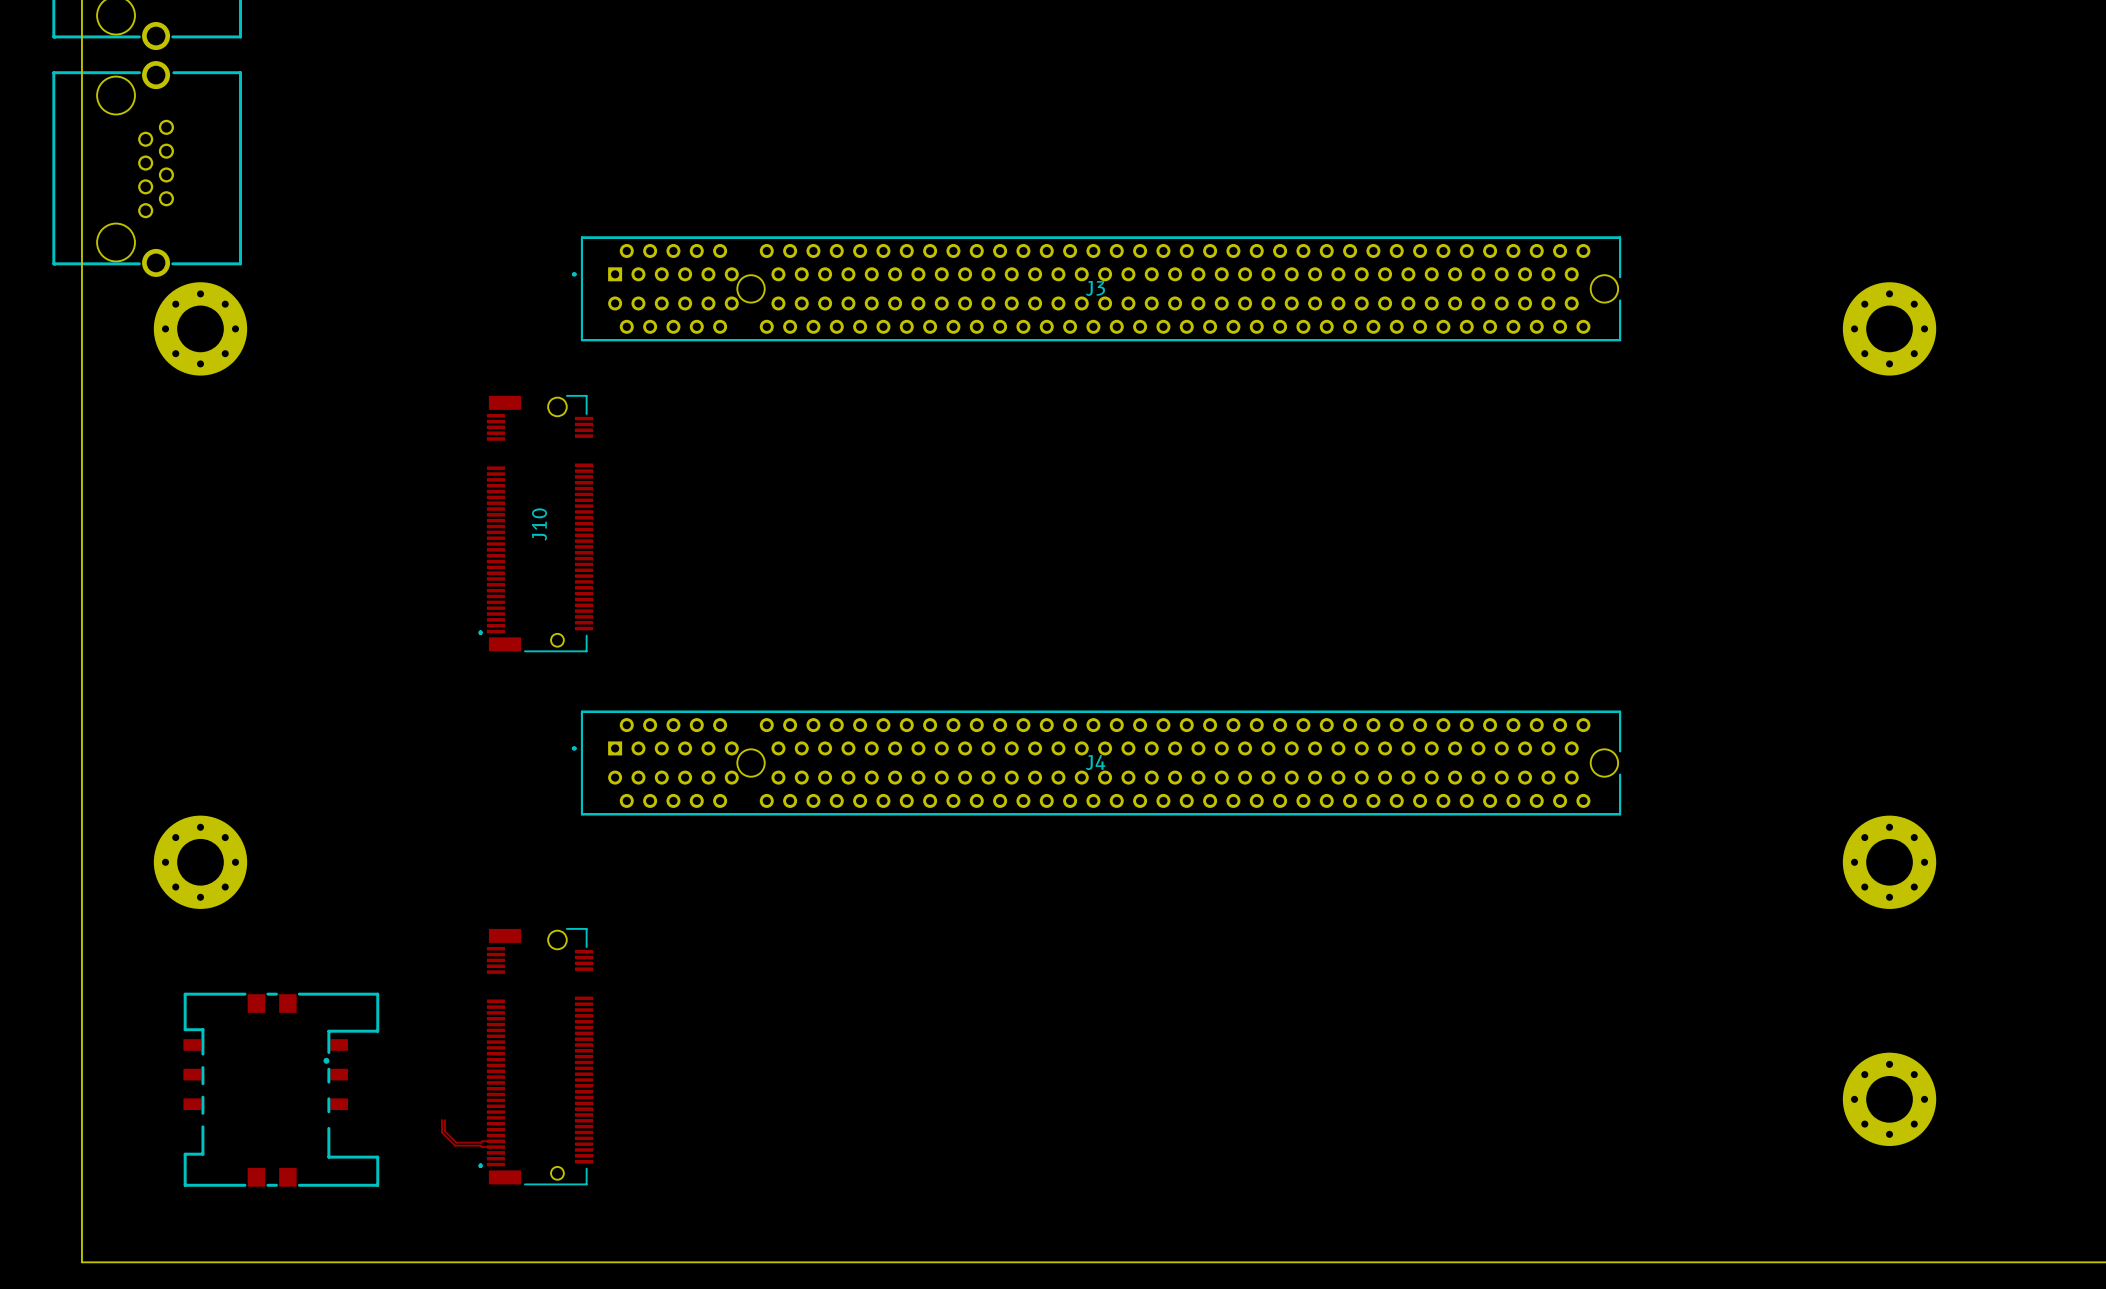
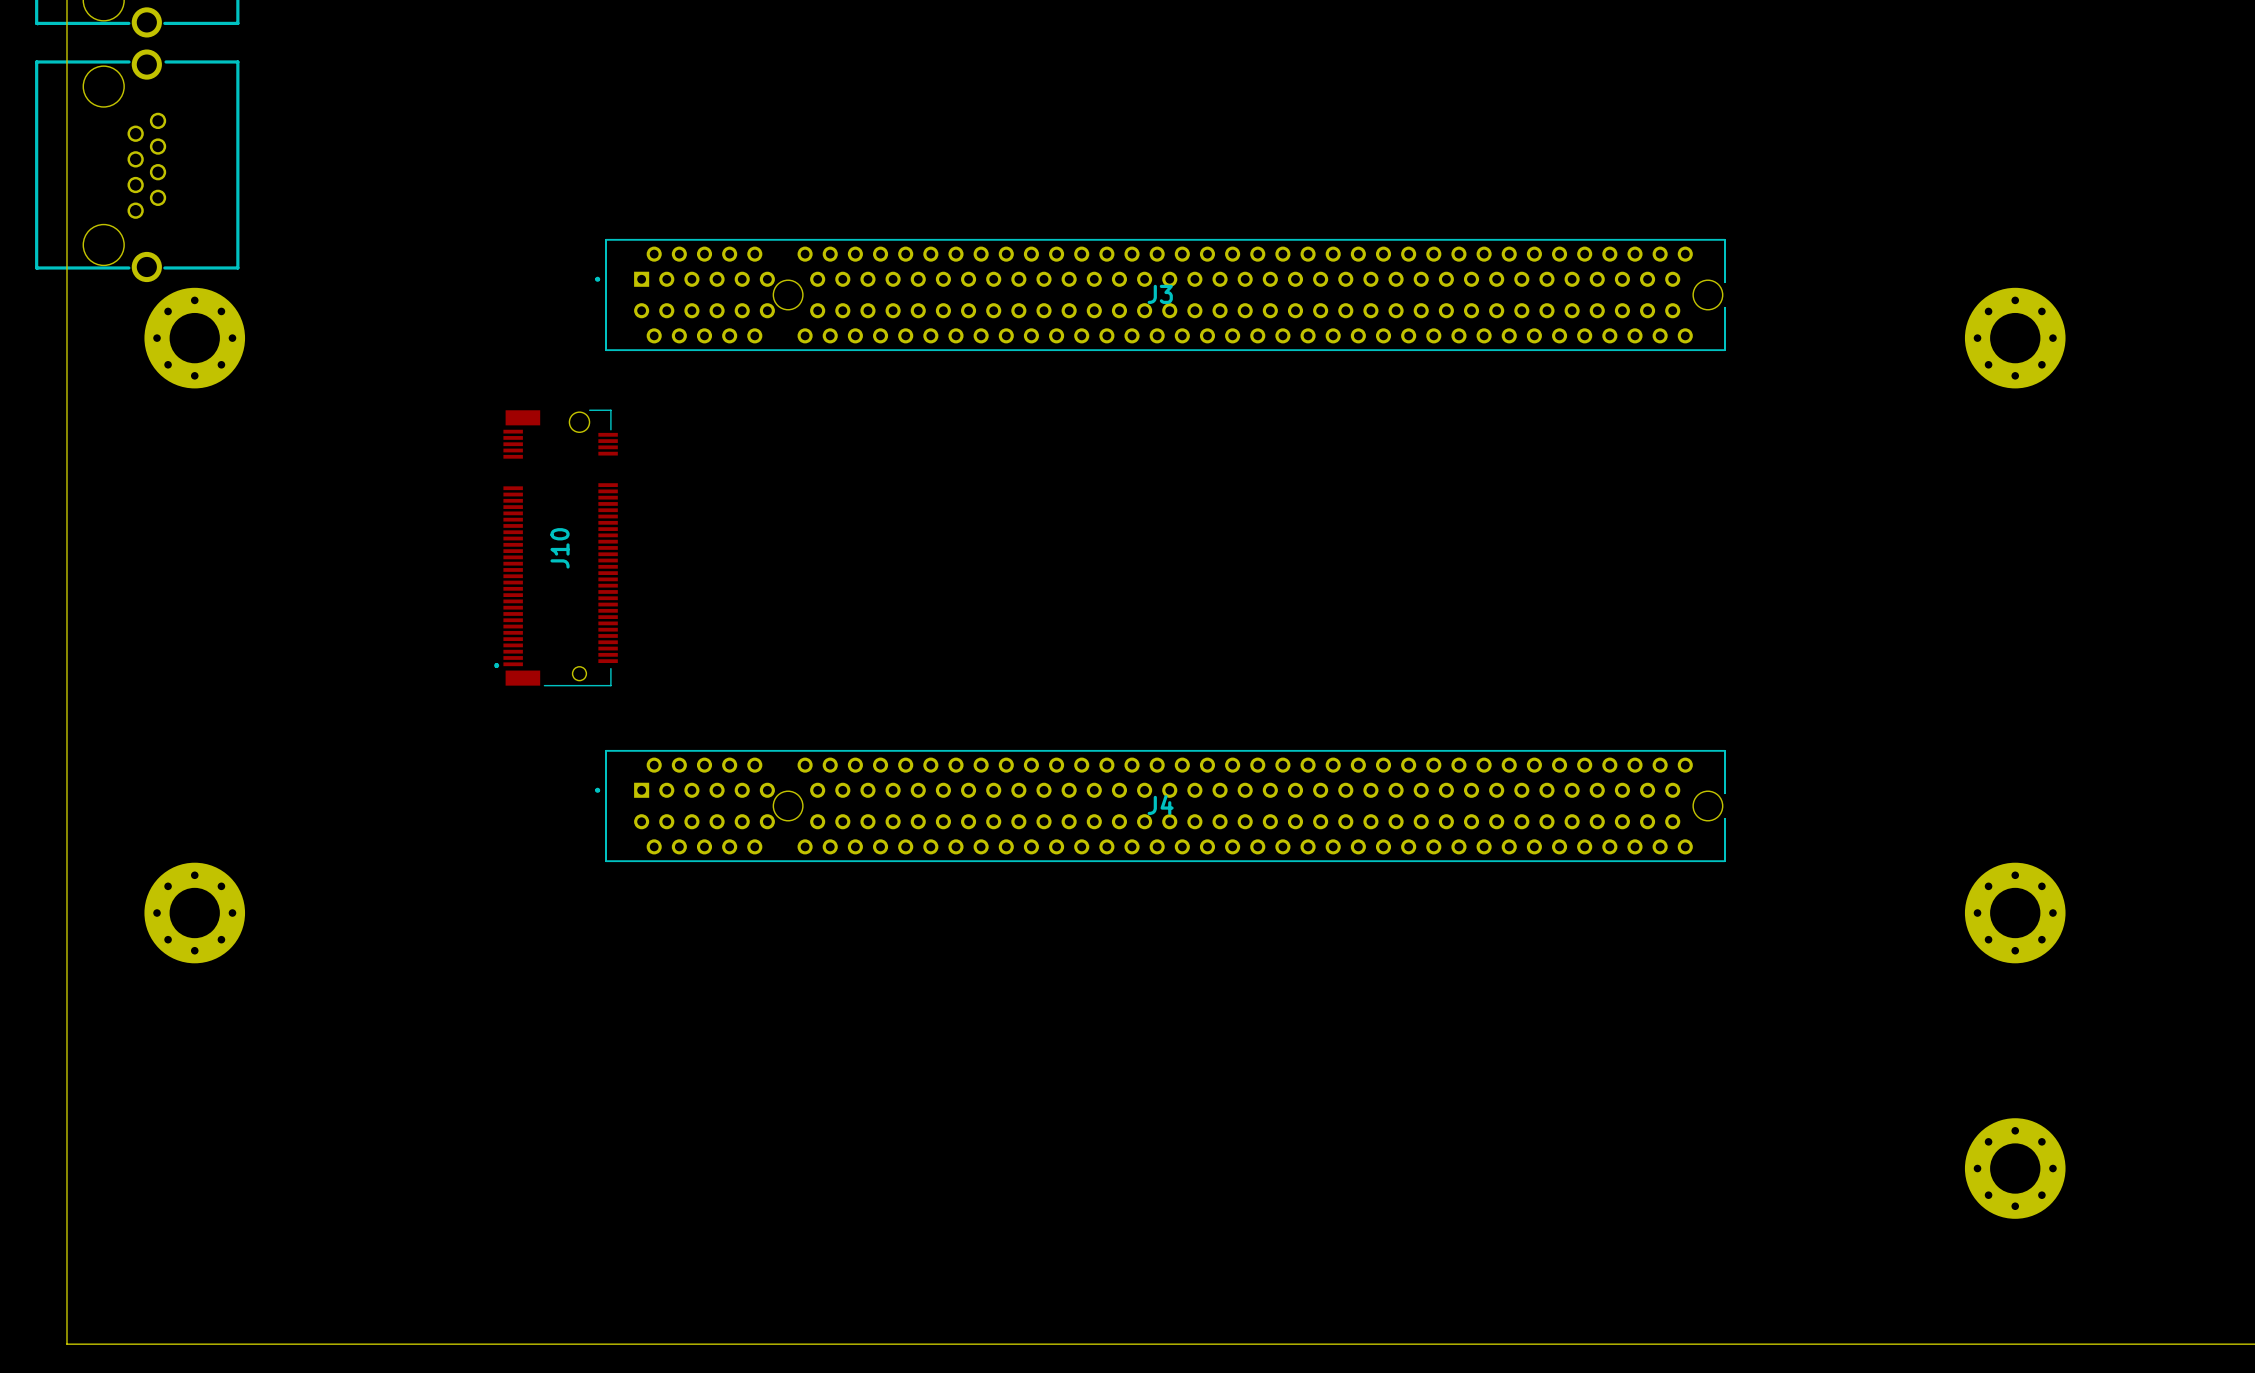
part: (535, 1056) -> none
part: (281, 1089) -> none
track: (442, 1120) (442, 1132) (455, 1145) (495, 1147) -> none
track: (444, 1120) (444, 1131) (456, 1142) (495, 1141) -> none

